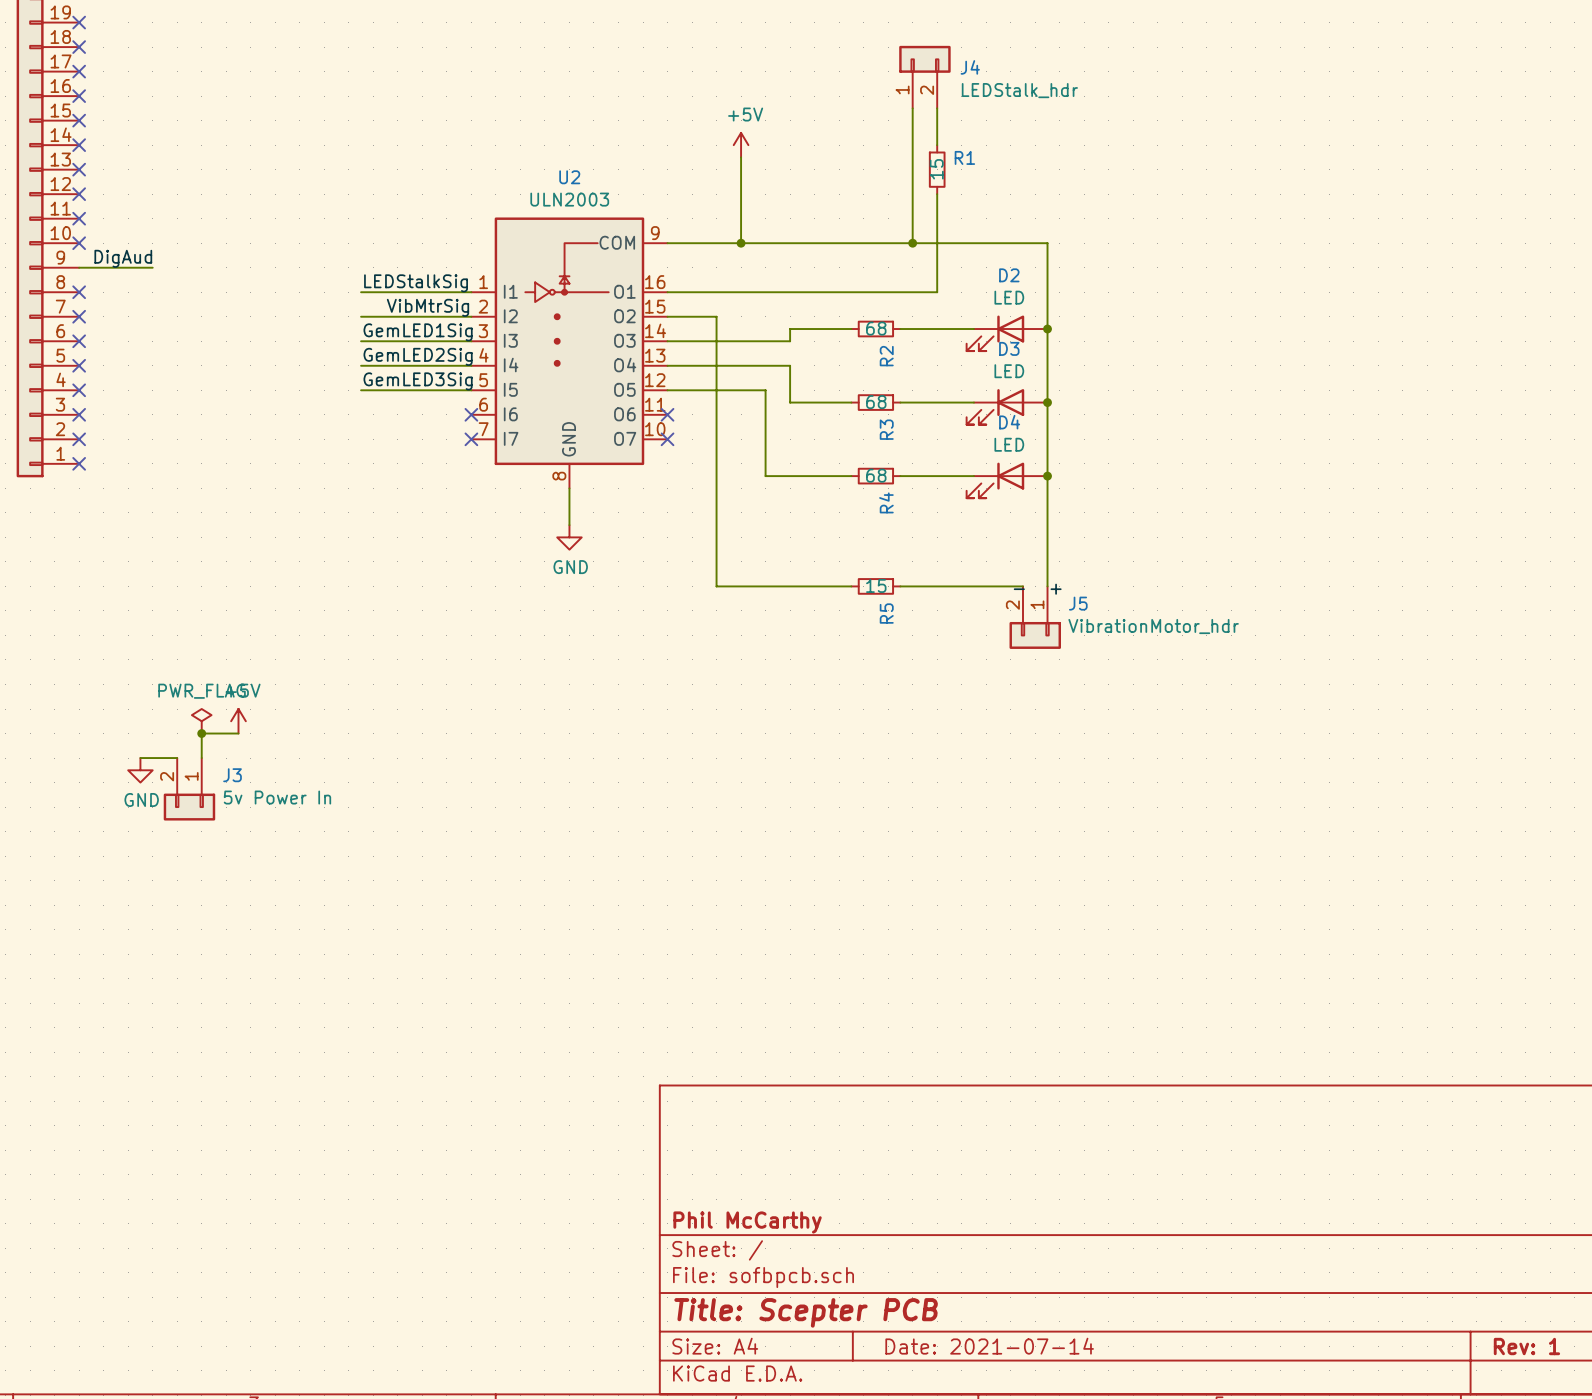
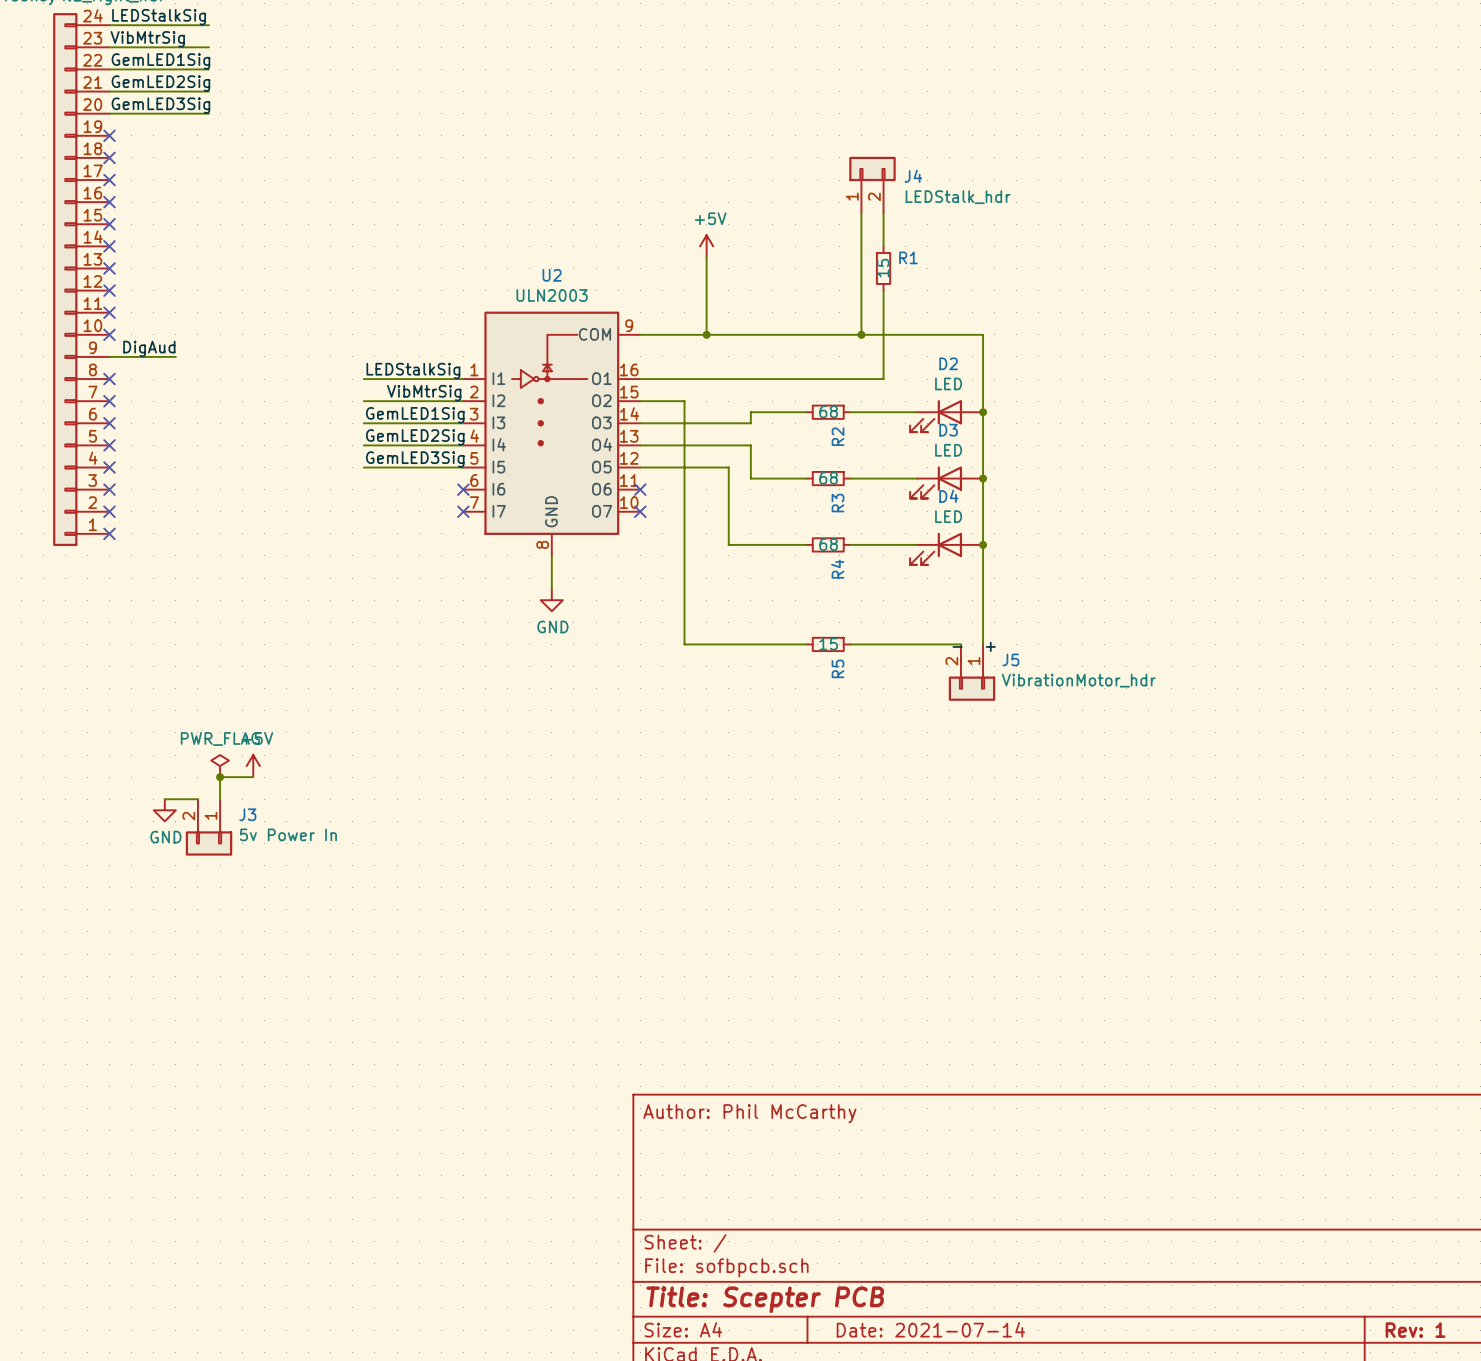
title block: none -> Author: Phil McCarthy (749, 1113)
title block: Phil McCarthy (747, 1222) -> none

